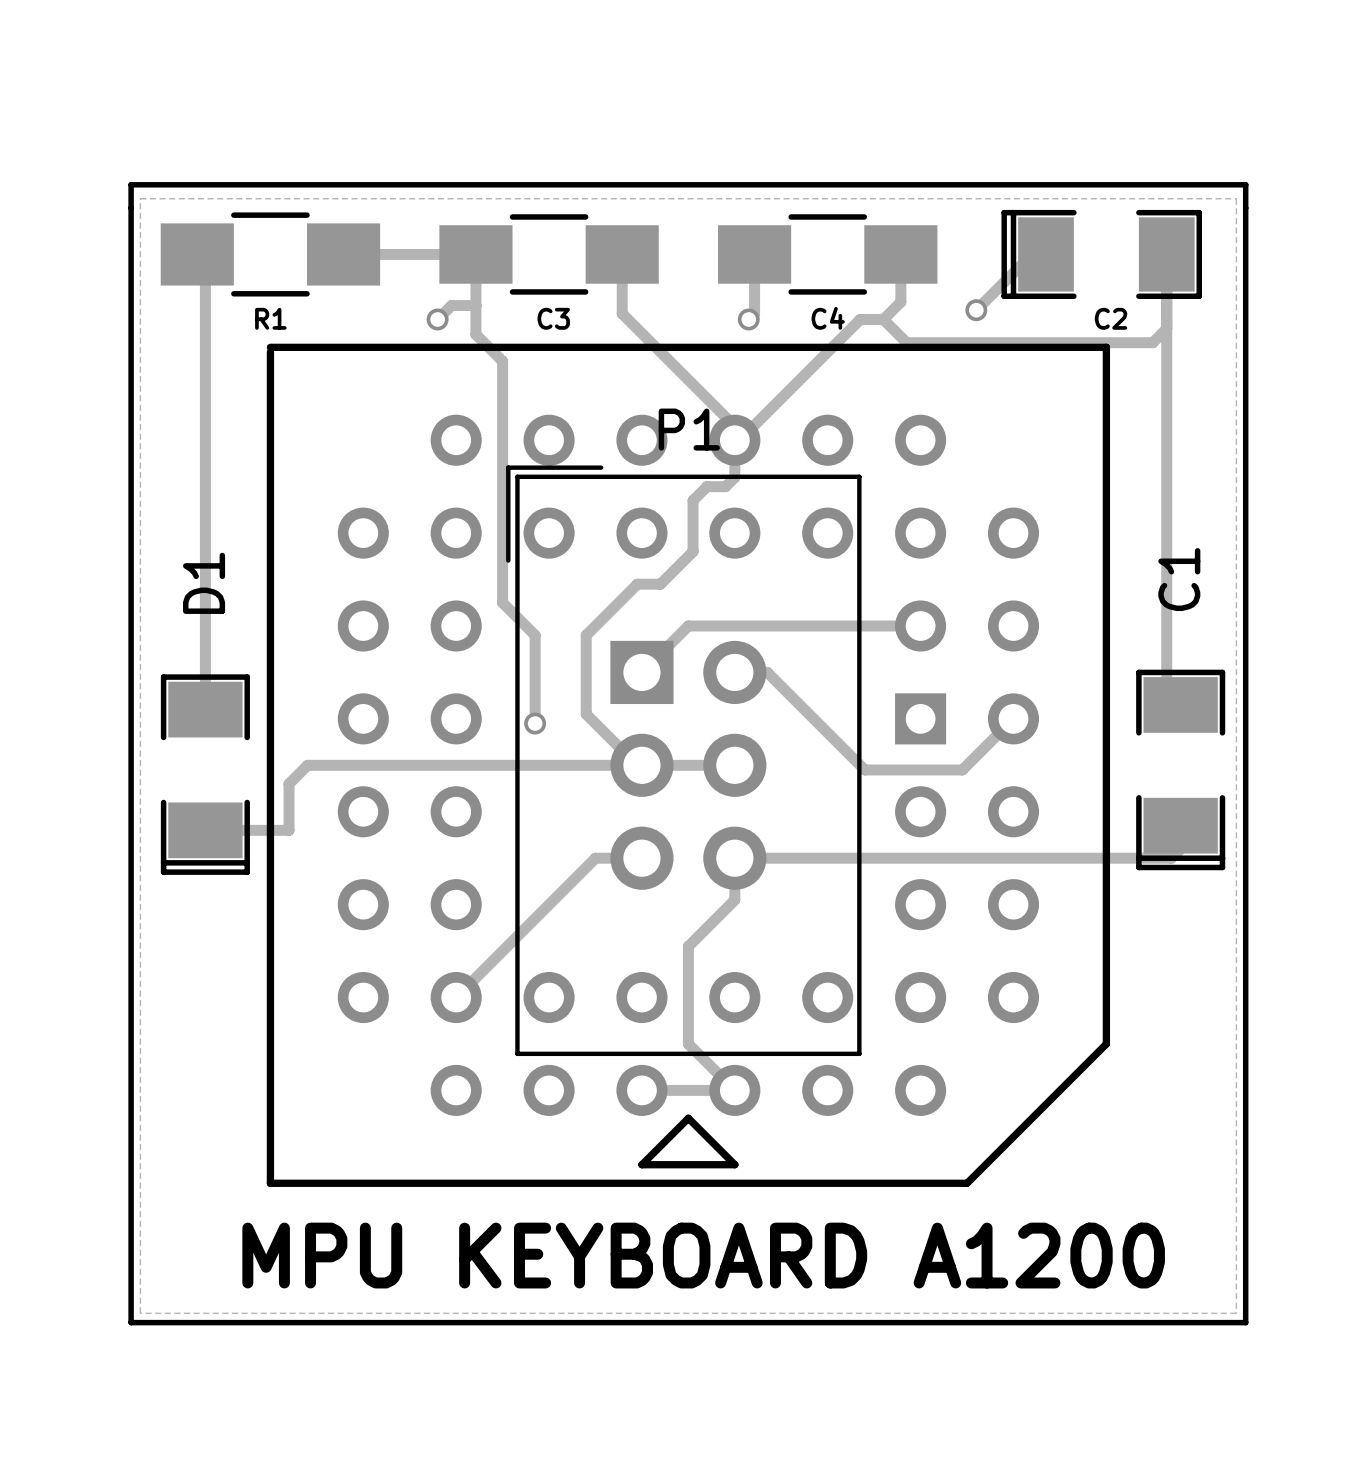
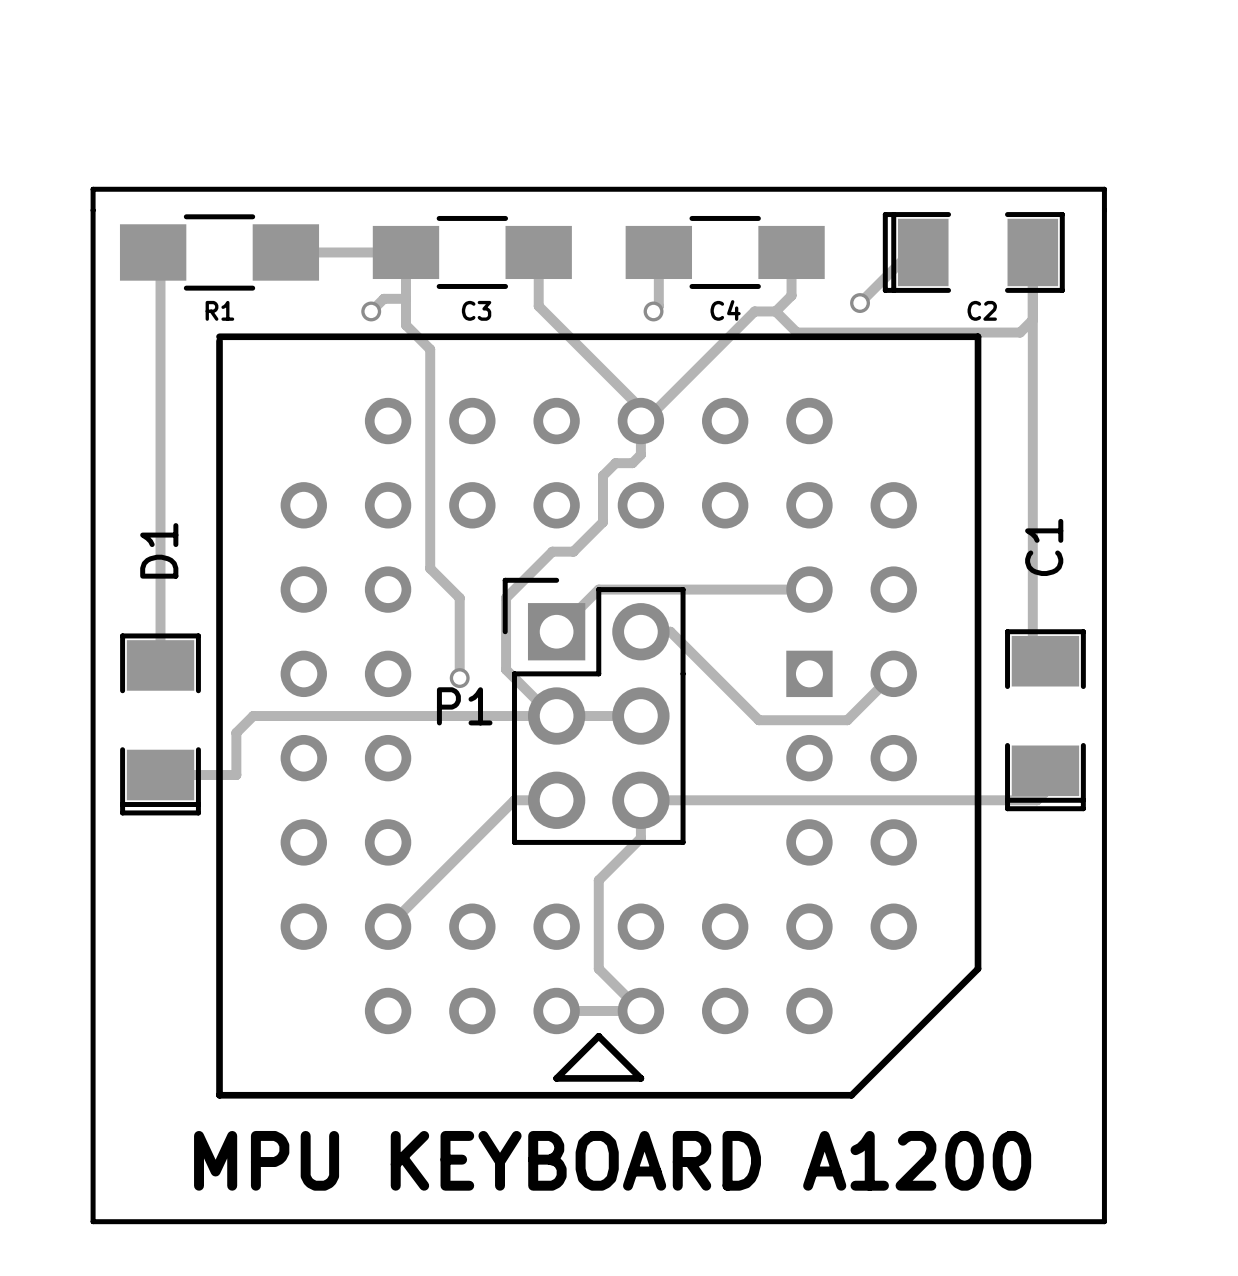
zone outline: (140, 198) (140, 1313) (1236, 1313) (1236, 198) (140, 198) -> none
P1 name position: P1 (689, 429) -> P1 (464, 706)
P1 footprint: [506, 465, 862, 1057] -> [502, 577, 686, 845]

